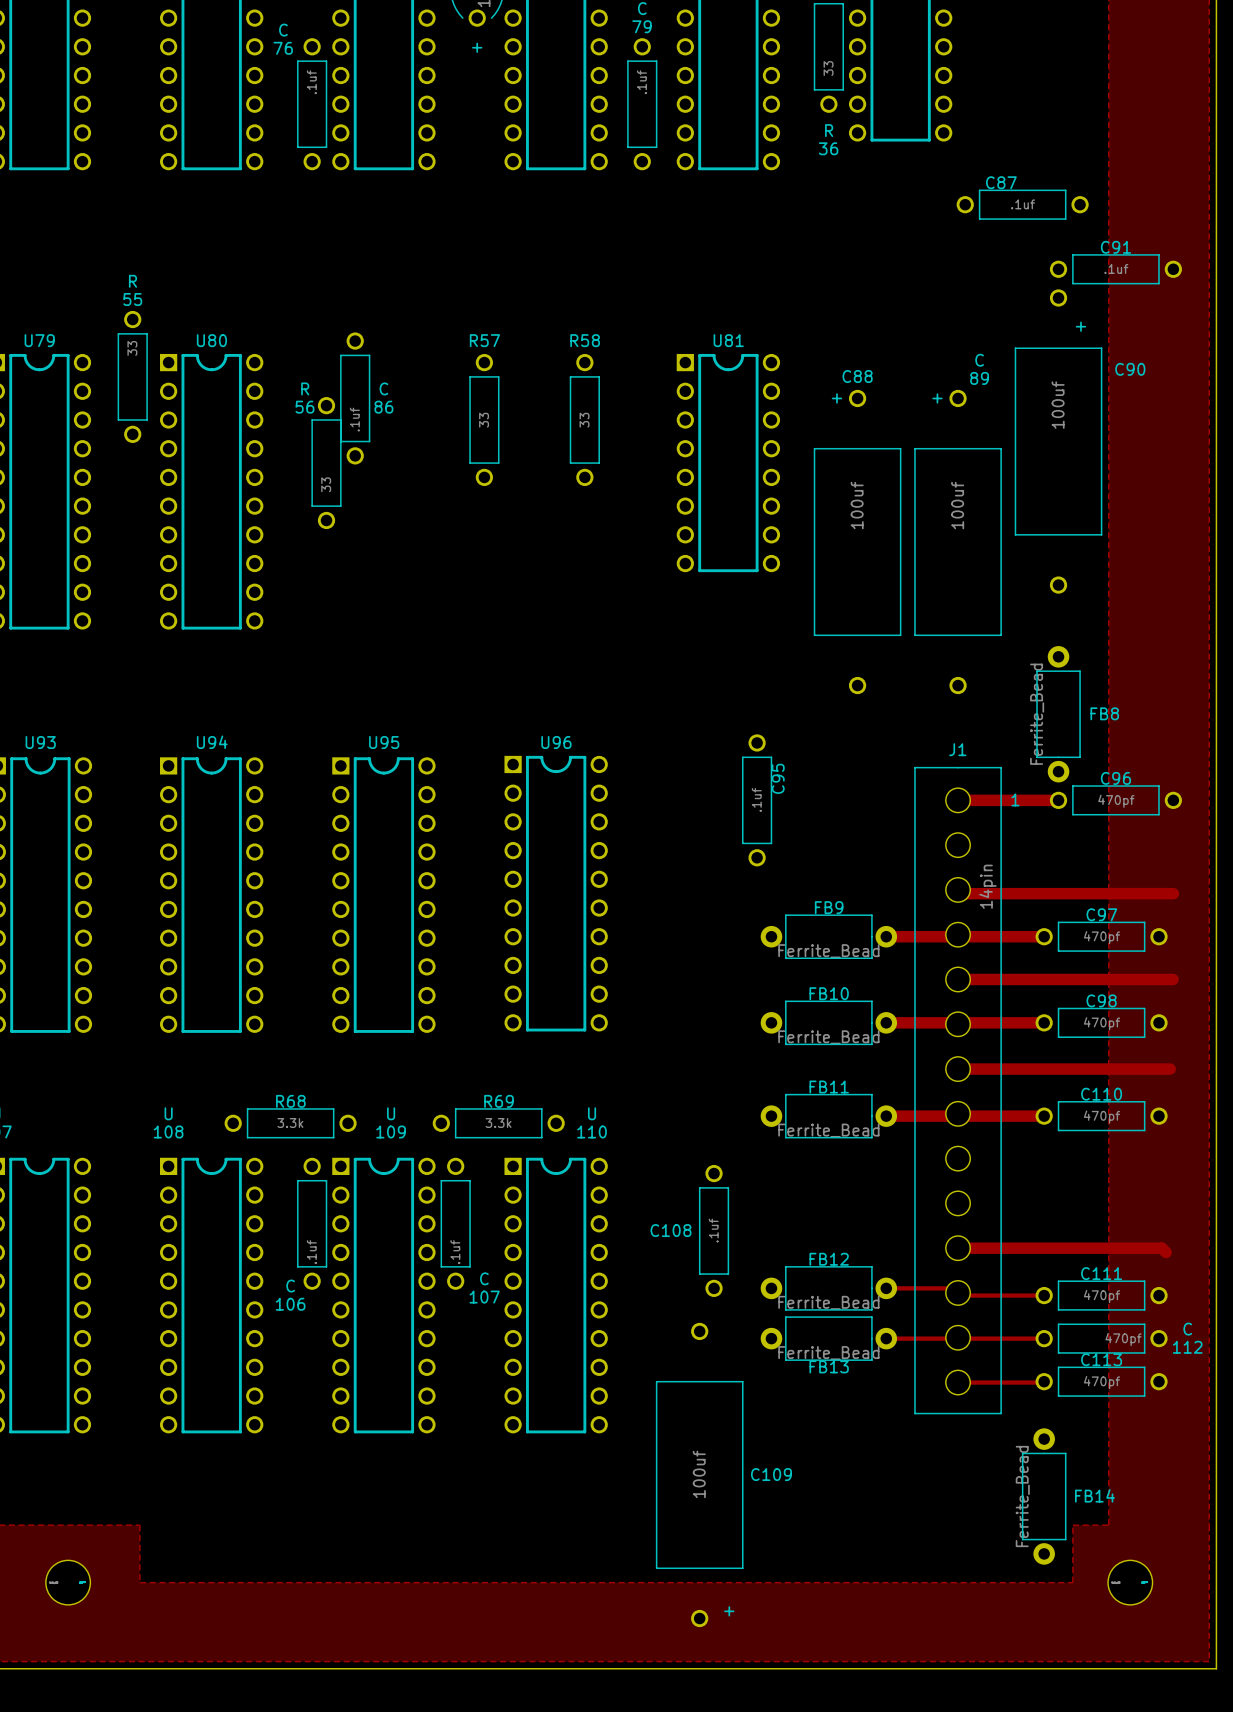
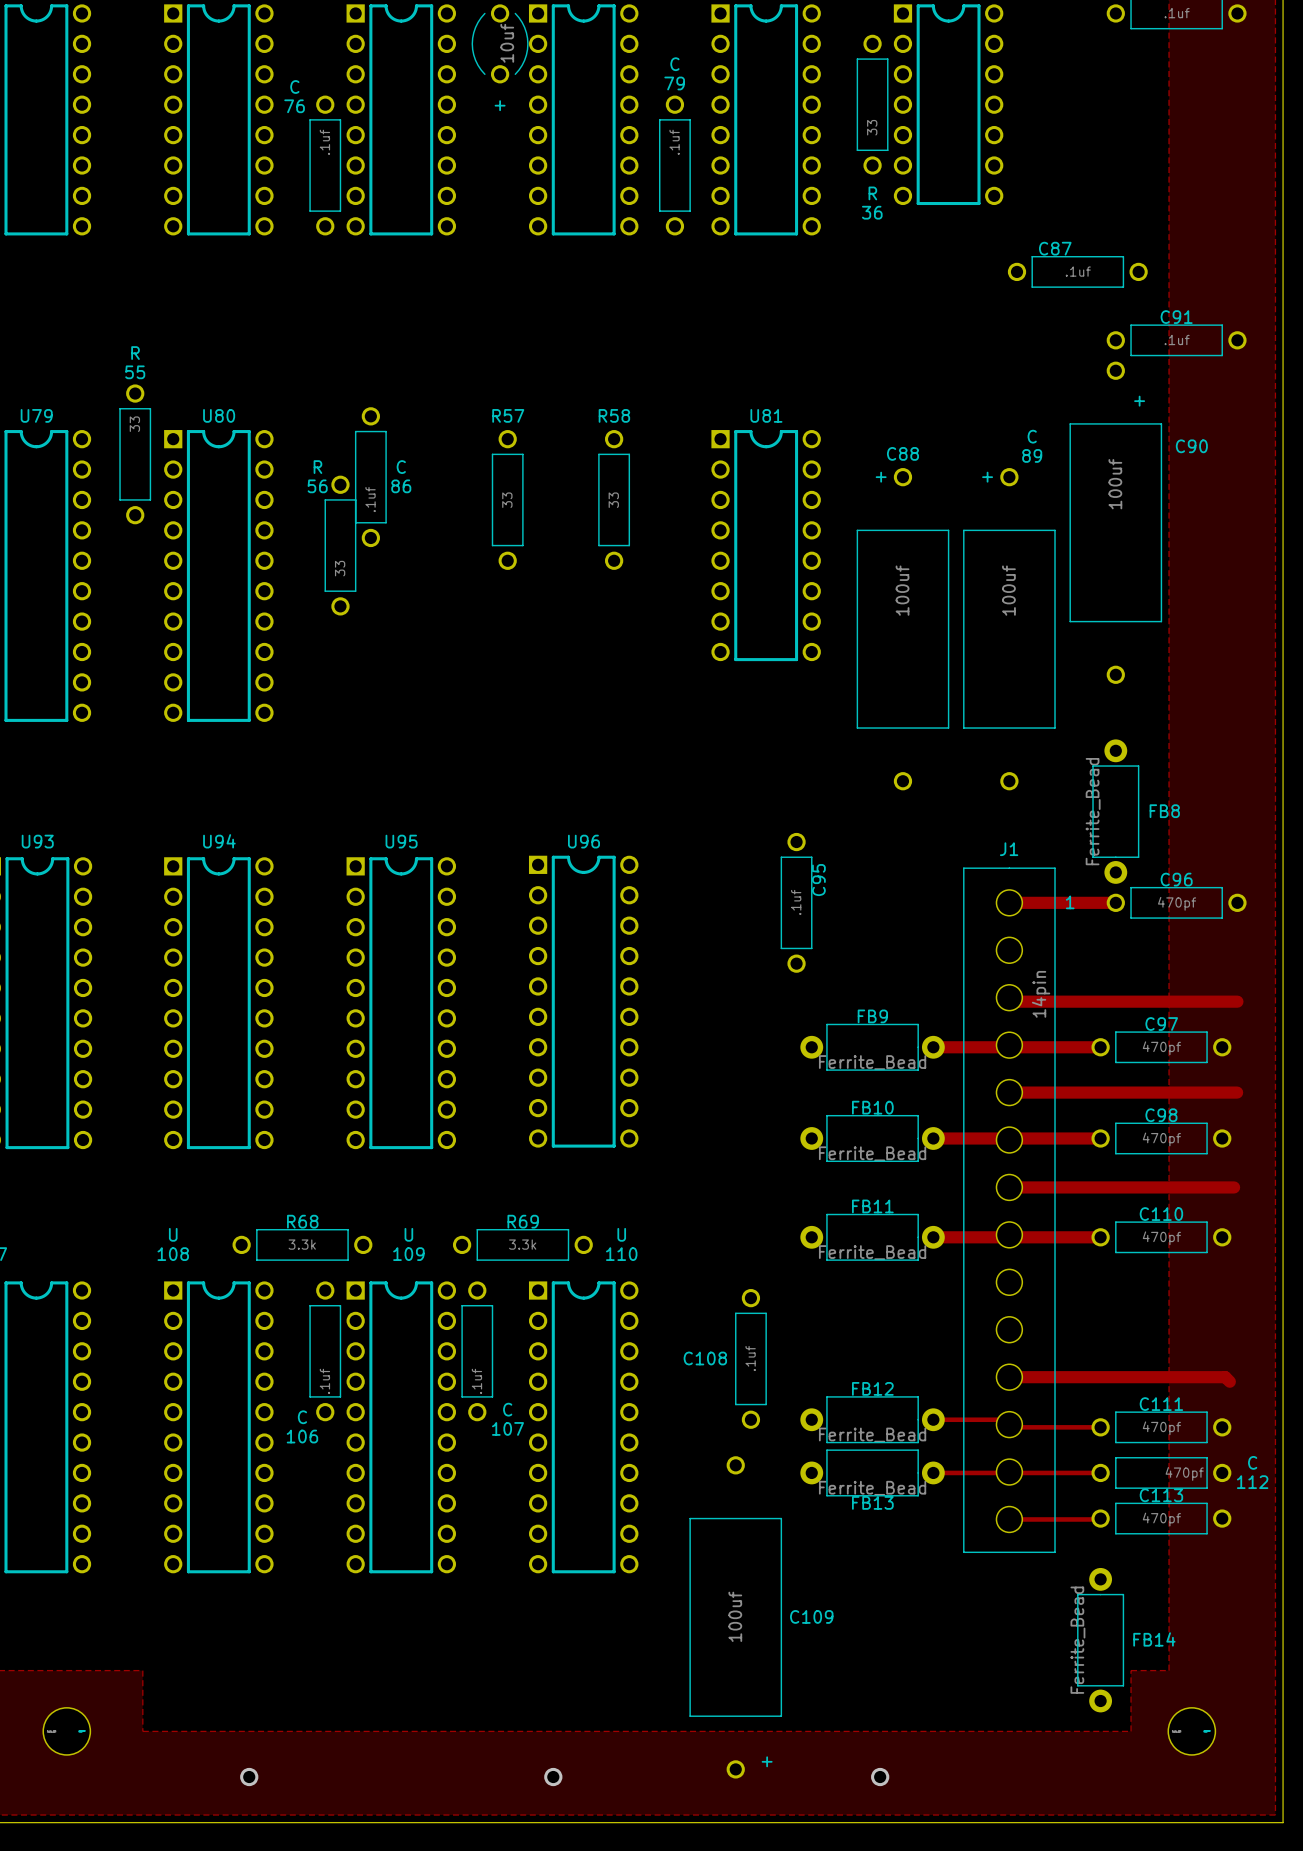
via: none -> (249, 1777)
via: none -> (553, 1777)
via: none -> (880, 1777)

